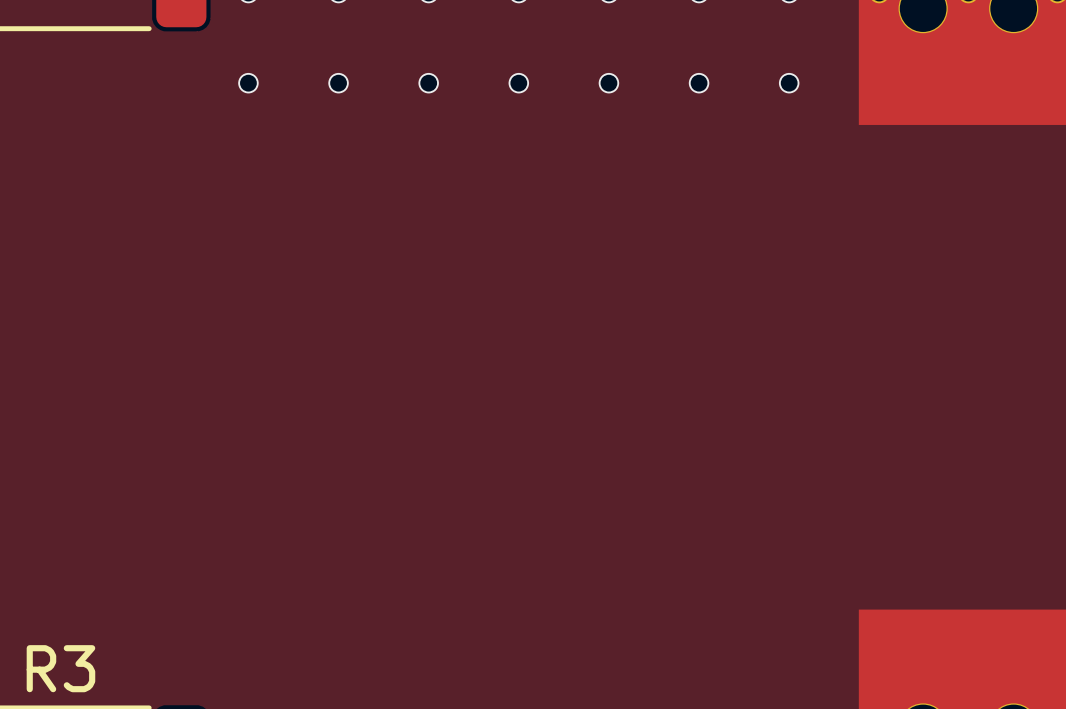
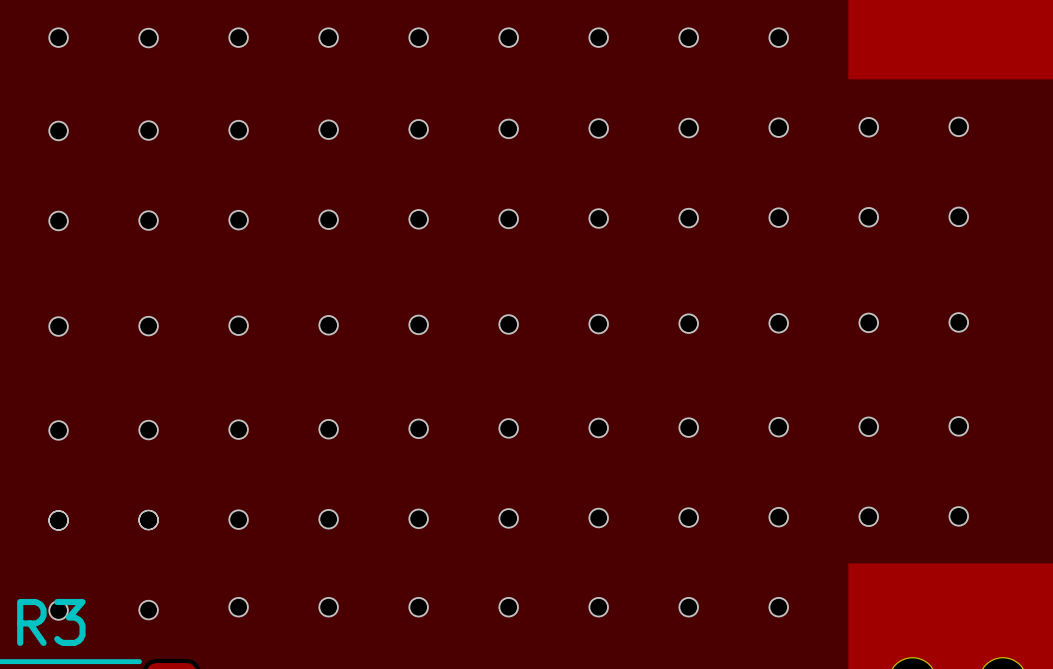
via: none -> (58, 37)
via: none -> (148, 38)
via: none -> (868, 127)
via: none -> (958, 126)
via: none -> (688, 128)
via: none -> (778, 127)
via: none -> (418, 129)
via: none -> (508, 128)
via: none -> (598, 128)
via: none -> (238, 130)
via: none -> (328, 129)
via: none -> (58, 130)
via: none -> (148, 130)
via: none -> (958, 216)
via: none -> (688, 218)
via: none -> (778, 217)
via: none -> (868, 217)
via: none -> (508, 218)
via: none -> (598, 218)
via: none -> (238, 220)
via: none -> (328, 219)
via: none -> (418, 219)
via: none -> (58, 220)
via: none -> (148, 220)
via: none -> (868, 322)
via: none -> (958, 322)
via: none -> (598, 324)
via: none -> (688, 323)
via: none -> (778, 323)
via: none -> (418, 324)
via: none -> (508, 324)
via: none -> (148, 326)
via: none -> (238, 325)
via: none -> (328, 325)
via: none -> (58, 326)
via: none -> (868, 426)
via: none -> (958, 426)
via: none -> (598, 427)
via: none -> (688, 427)
via: none -> (778, 427)
via: none -> (418, 428)
via: none -> (508, 428)
via: none -> (238, 429)
via: none -> (328, 429)
via: none -> (58, 430)
via: none -> (148, 430)
via: none -> (868, 516)
via: none -> (958, 516)
via: none -> (688, 517)
via: none -> (778, 517)
via: none -> (418, 518)
via: none -> (508, 518)
via: none -> (598, 518)
via: none -> (238, 519)
via: none -> (328, 519)
via: none -> (58, 520)
via: none -> (148, 520)
via: none -> (238, 607)
via: none -> (328, 607)
via: none -> (418, 607)
via: none -> (508, 607)
via: none -> (598, 607)
via: none -> (688, 607)
via: none -> (778, 607)
via: none -> (58, 610)
via: none -> (148, 610)

